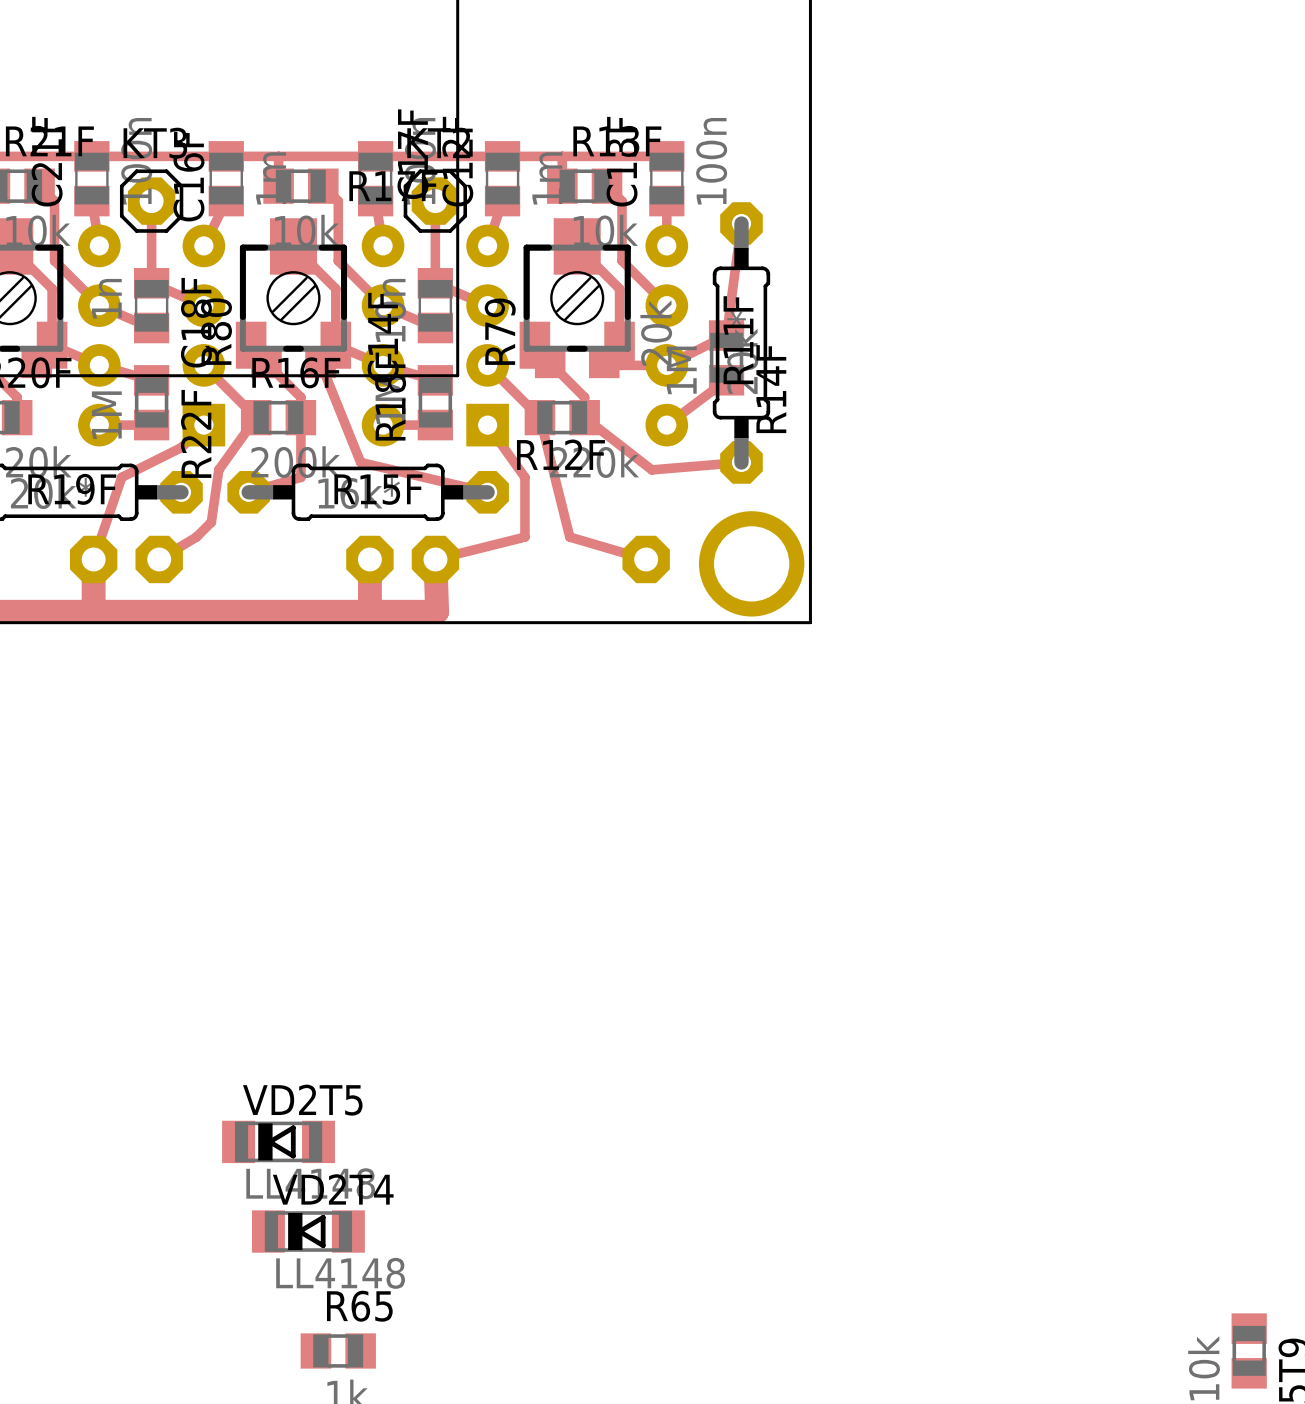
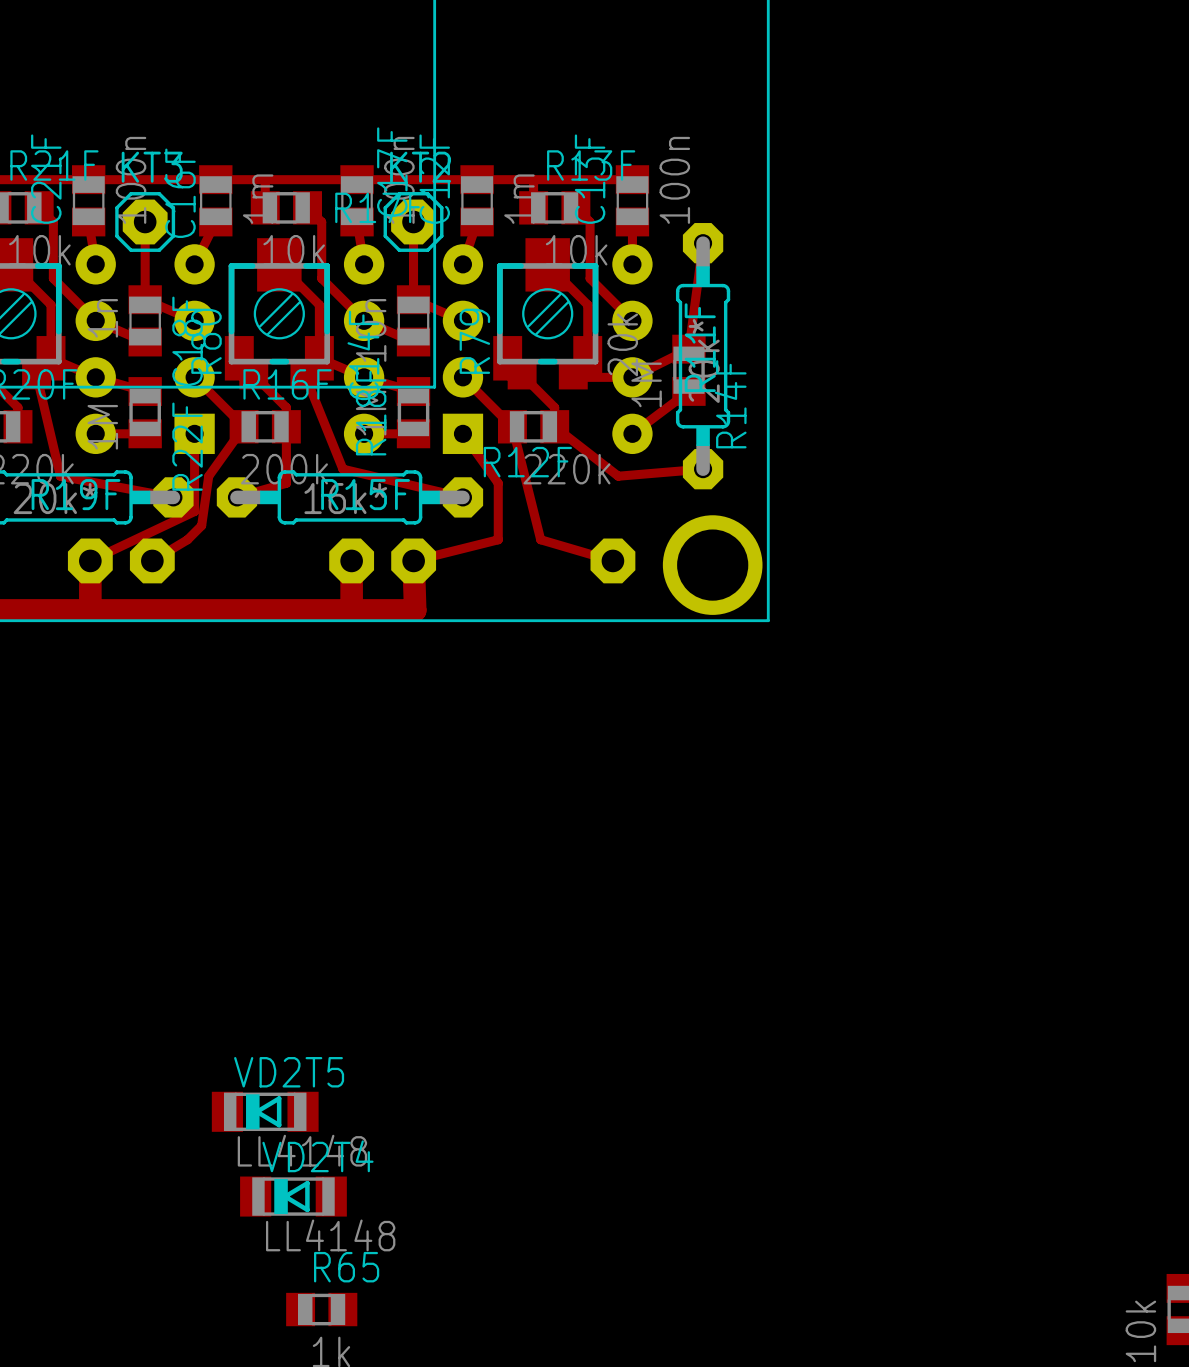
track: none -> (36, 374) (60, 476) (173, 497)
track: (203, 425) (181, 447) (121, 477) (93, 559) -> (194, 433) (194, 511) (90, 560)

